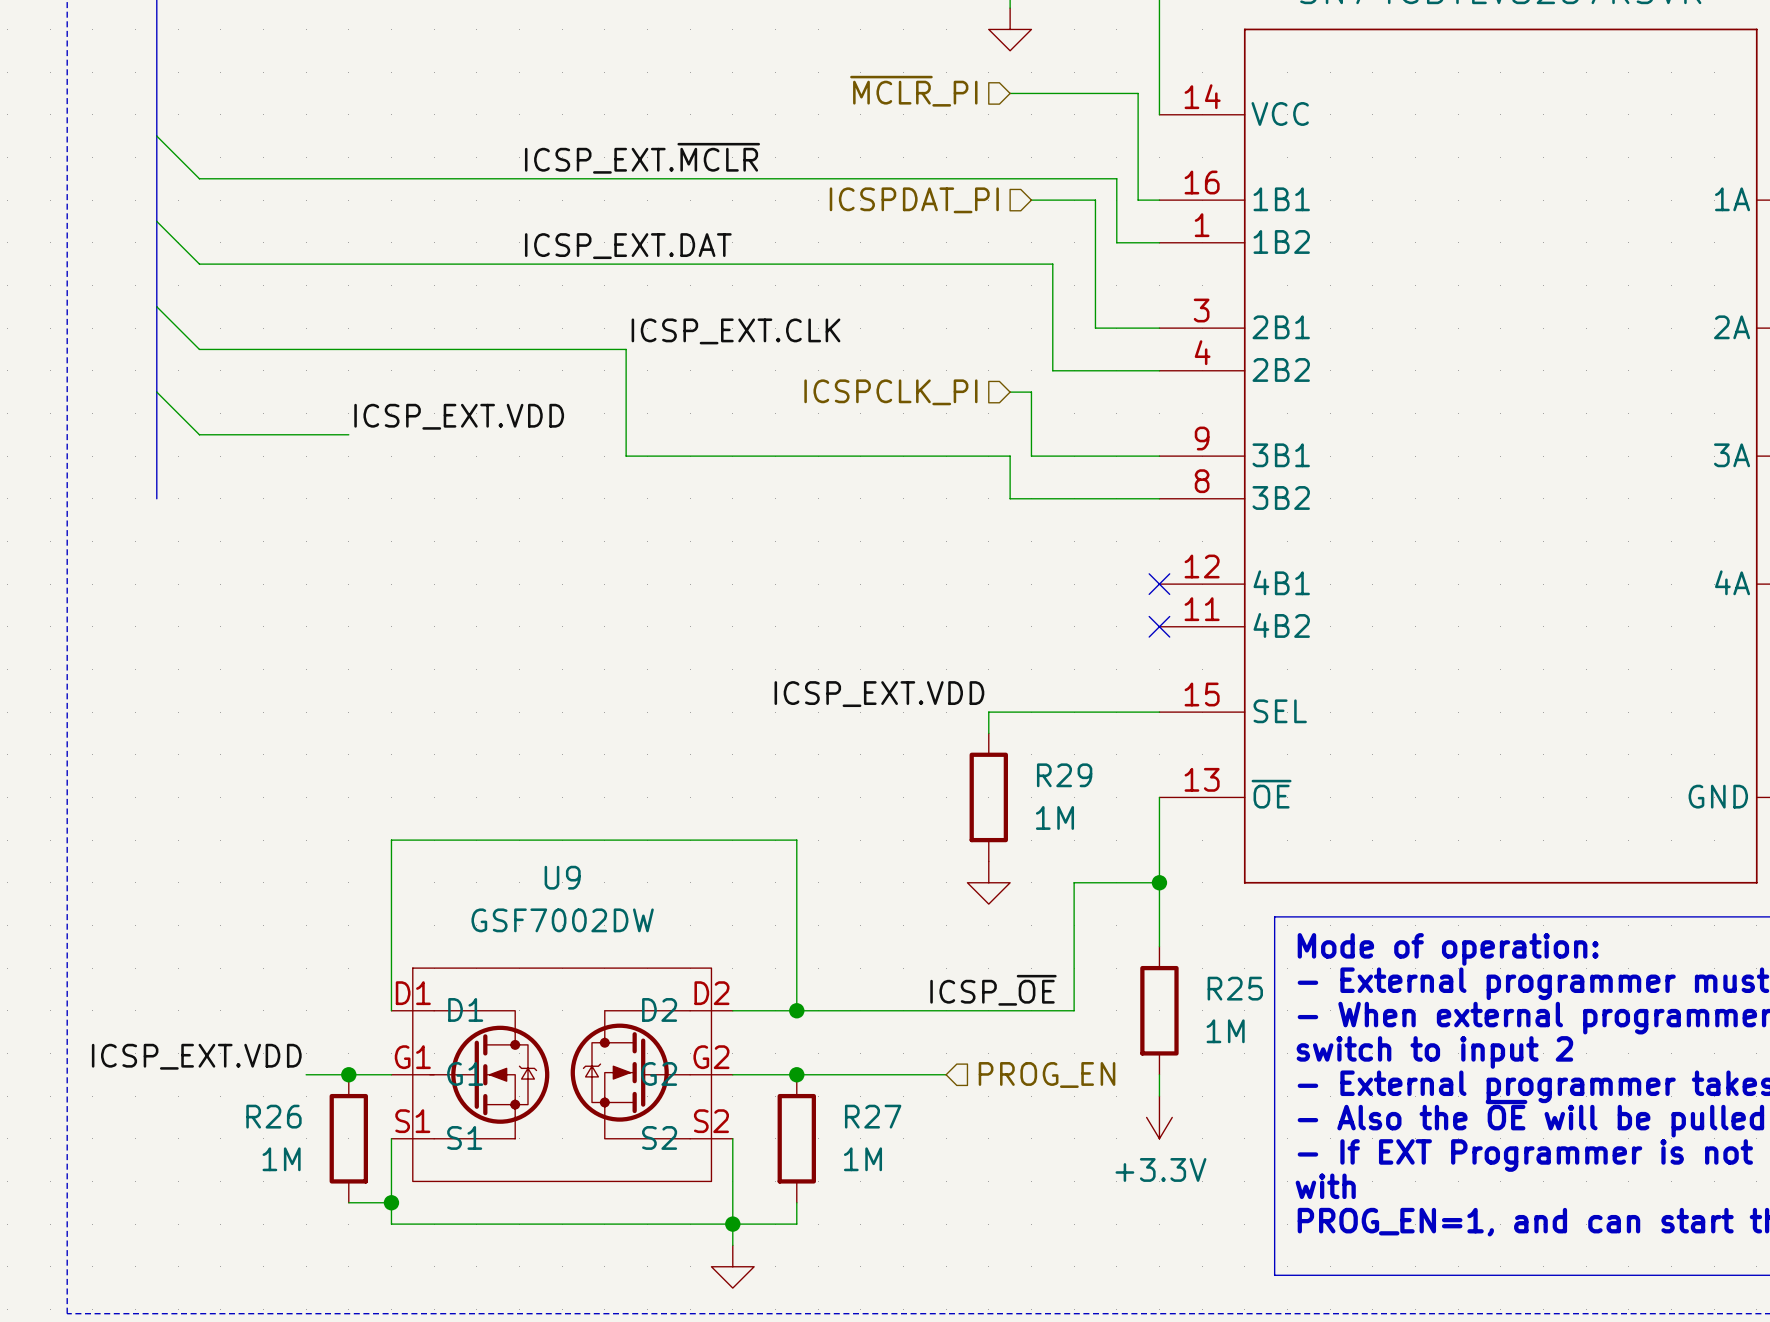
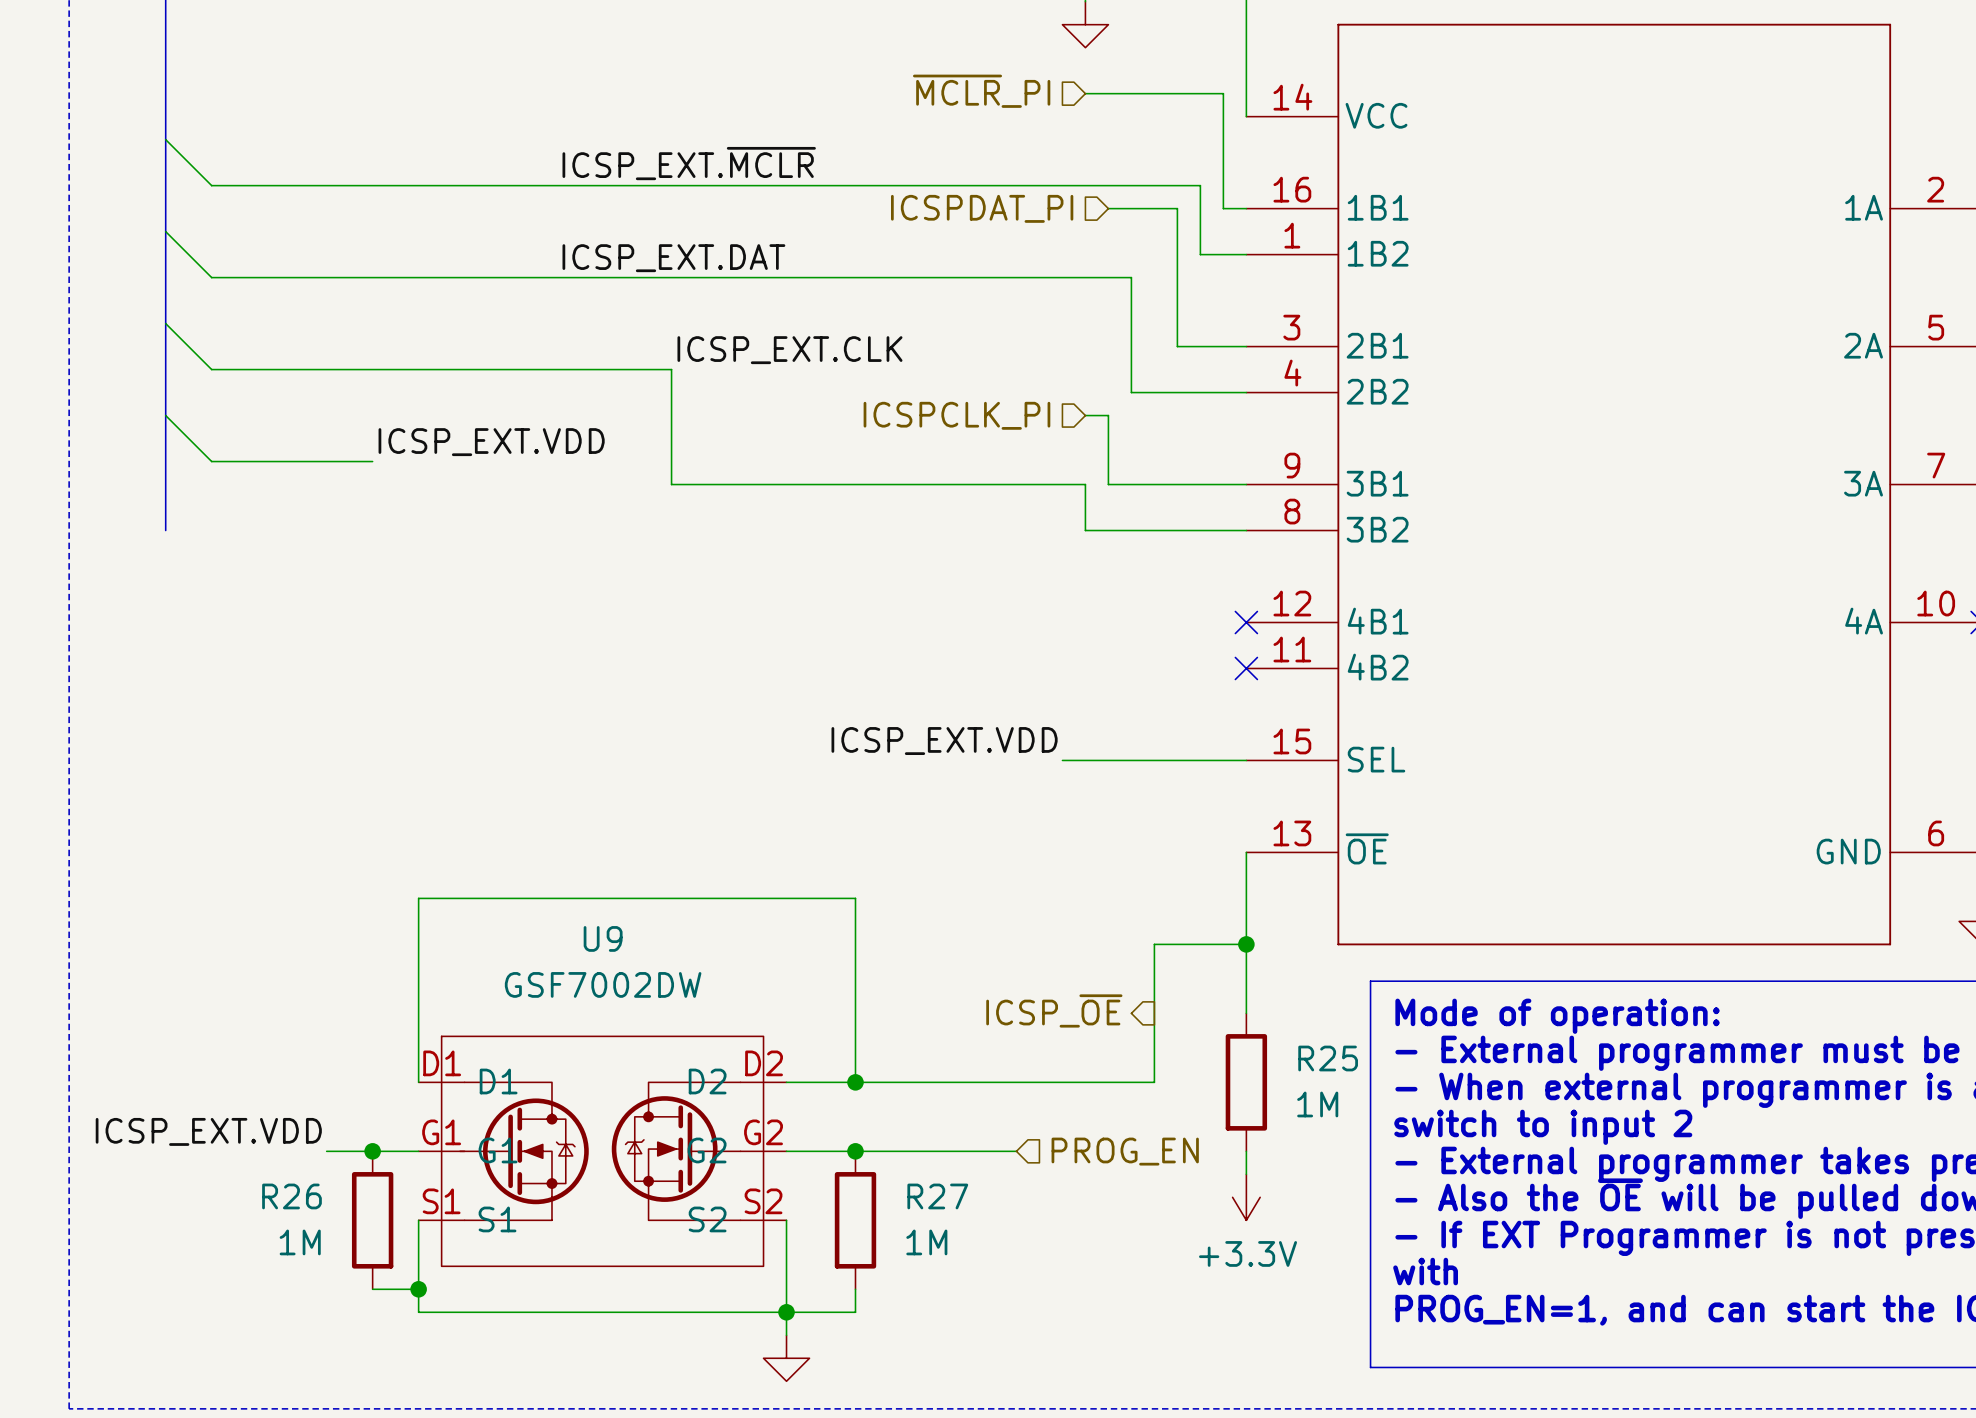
wire: (988, 712) (988, 733) -> none
R29: 1M (988, 797) -> none
power symbol: (988, 882) -> none
hierarchical label: none -> ICSP_~{OE} (1054, 1010)
label: ICSP_~{OE} (993, 990) -> none

